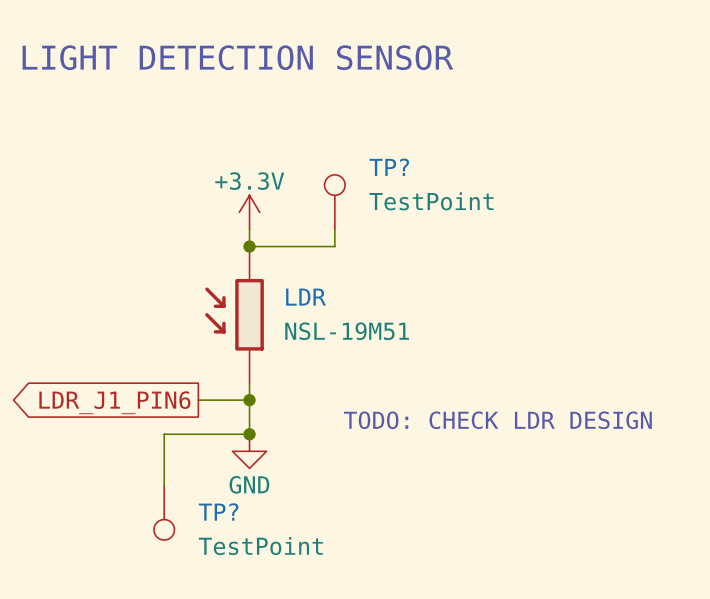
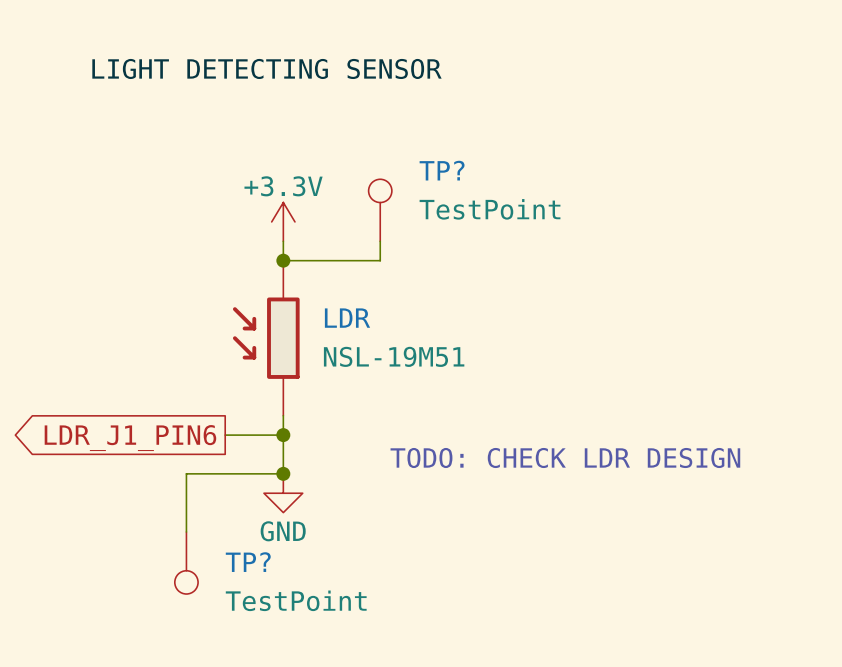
text: LIGHT DETECTION SENSOR (237, 57) -> none
label: none -> LIGHT DETECTING SENSOR (266, 68)

